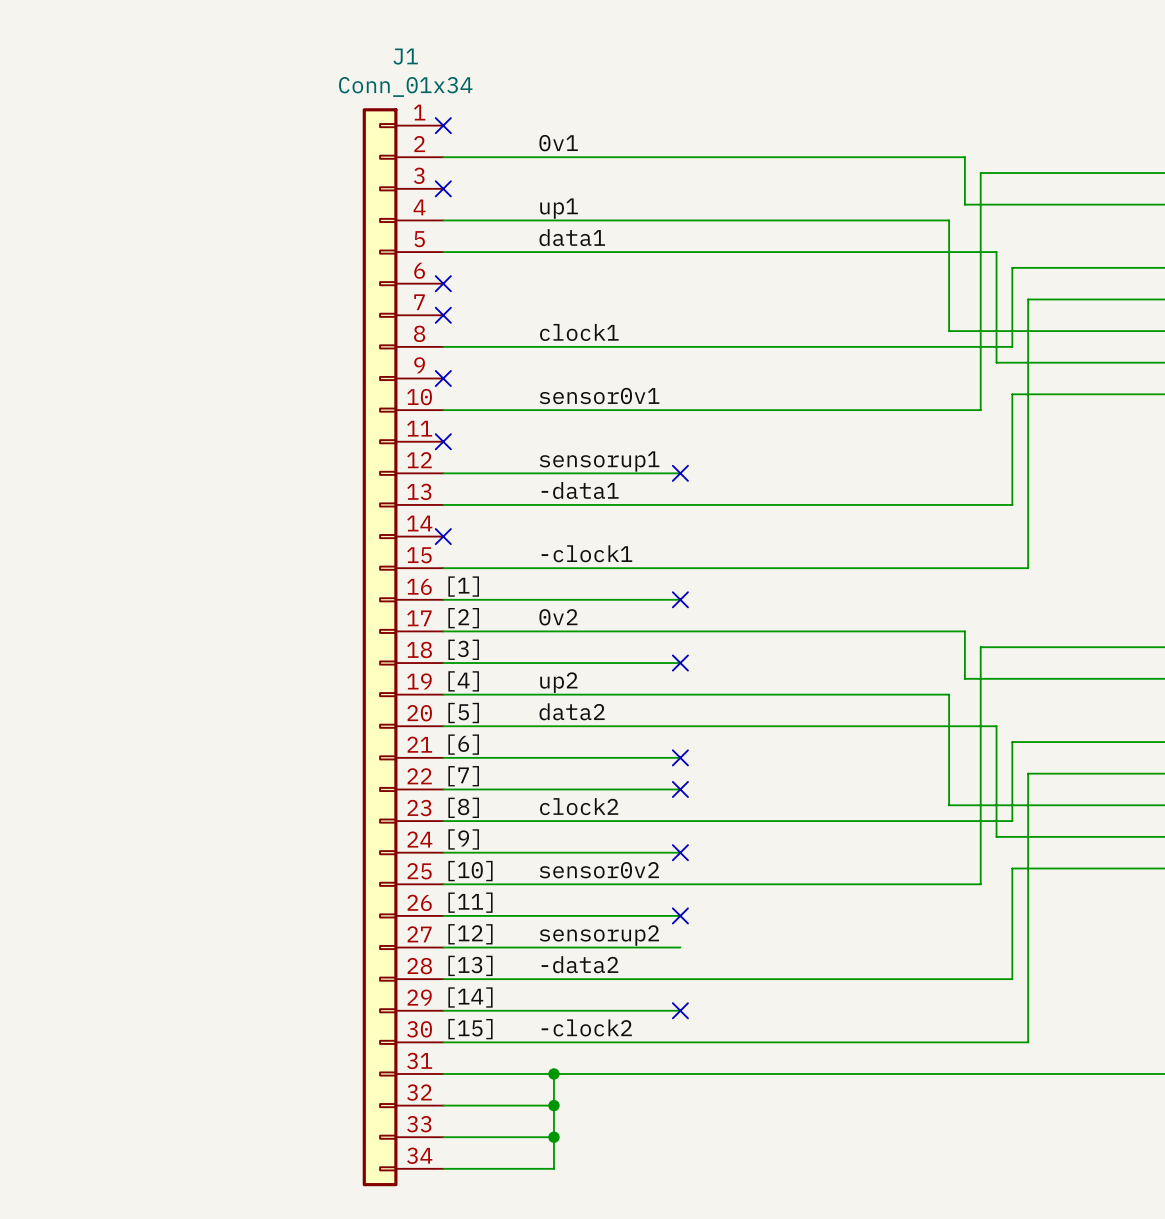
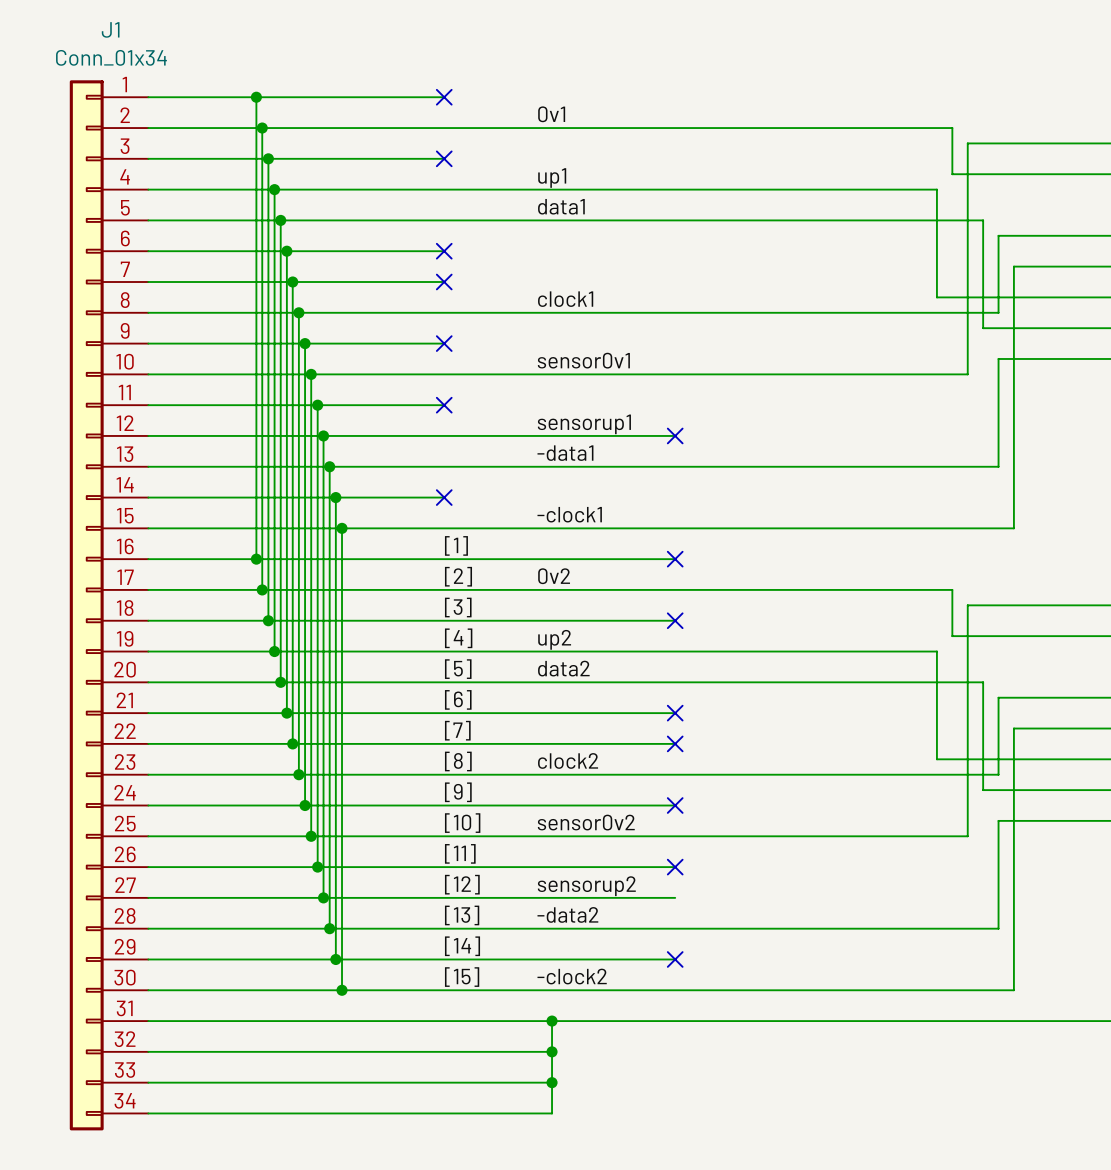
wire: none -> (148, 97) (444, 97)
wire: none -> (256, 97) (256, 559)
junction: none -> (256, 97)
wire: none -> (148, 128) (444, 128)
wire: none -> (262, 128) (262, 589)
junction: none -> (262, 128)
wire: none -> (148, 158) (444, 158)
wire: none -> (268, 158) (268, 620)
junction: none -> (268, 158)
wire: none -> (148, 189) (444, 189)
wire: none -> (274, 189) (274, 651)
junction: none -> (274, 189)
wire: none -> (148, 220) (444, 220)
wire: none -> (280, 220) (280, 682)
junction: none -> (280, 220)
wire: none -> (148, 251) (444, 251)
wire: none -> (286, 251) (286, 713)
junction: none -> (286, 251)
wire: none -> (148, 282) (444, 282)
wire: none -> (292, 282) (292, 743)
junction: none -> (292, 282)
wire: none -> (148, 312) (444, 312)
wire: none -> (298, 312) (298, 774)
junction: none -> (298, 312)
wire: none -> (148, 343) (444, 343)
wire: none -> (305, 343) (305, 805)
junction: none -> (305, 343)
wire: none -> (148, 374) (444, 374)
wire: none -> (311, 374) (311, 836)
junction: none -> (311, 374)
wire: none -> (148, 405) (444, 405)
wire: none -> (317, 405) (317, 867)
junction: none -> (317, 405)
wire: none -> (148, 435) (444, 435)
wire: none -> (323, 435) (323, 897)
junction: none -> (323, 435)
wire: none -> (148, 466) (444, 466)
wire: none -> (329, 466) (329, 928)
junction: none -> (329, 466)
wire: none -> (148, 497) (444, 497)
wire: none -> (335, 497) (335, 959)
junction: none -> (335, 497)
wire: none -> (148, 528) (444, 528)
wire: none -> (342, 528) (342, 990)
junction: none -> (342, 528)
wire: none -> (148, 559) (444, 559)
junction: none -> (256, 559)
wire: none -> (148, 589) (444, 589)
junction: none -> (262, 589)
J1 position: (403, 647) -> (109, 605)
wire: none -> (148, 620) (444, 620)
junction: none -> (268, 620)
wire: none -> (148, 651) (444, 651)
junction: none -> (274, 651)
wire: none -> (148, 682) (444, 682)
junction: none -> (280, 682)
wire: none -> (148, 713) (444, 713)
junction: none -> (286, 713)
wire: none -> (148, 743) (444, 743)
junction: none -> (292, 743)
wire: none -> (148, 774) (444, 774)
junction: none -> (298, 774)
wire: none -> (148, 805) (444, 805)
junction: none -> (305, 805)
wire: none -> (148, 836) (444, 836)
junction: none -> (311, 836)
wire: none -> (148, 867) (444, 867)
junction: none -> (317, 867)
wire: none -> (148, 897) (444, 897)
junction: none -> (323, 897)
wire: none -> (148, 928) (444, 928)
junction: none -> (329, 928)
wire: none -> (148, 959) (444, 959)
junction: none -> (335, 959)
wire: none -> (148, 990) (444, 990)
junction: none -> (342, 990)
wire: none -> (148, 1021) (444, 1021)
wire: none -> (148, 1051) (444, 1051)
wire: none -> (148, 1082) (444, 1082)
wire: none -> (148, 1113) (444, 1113)

